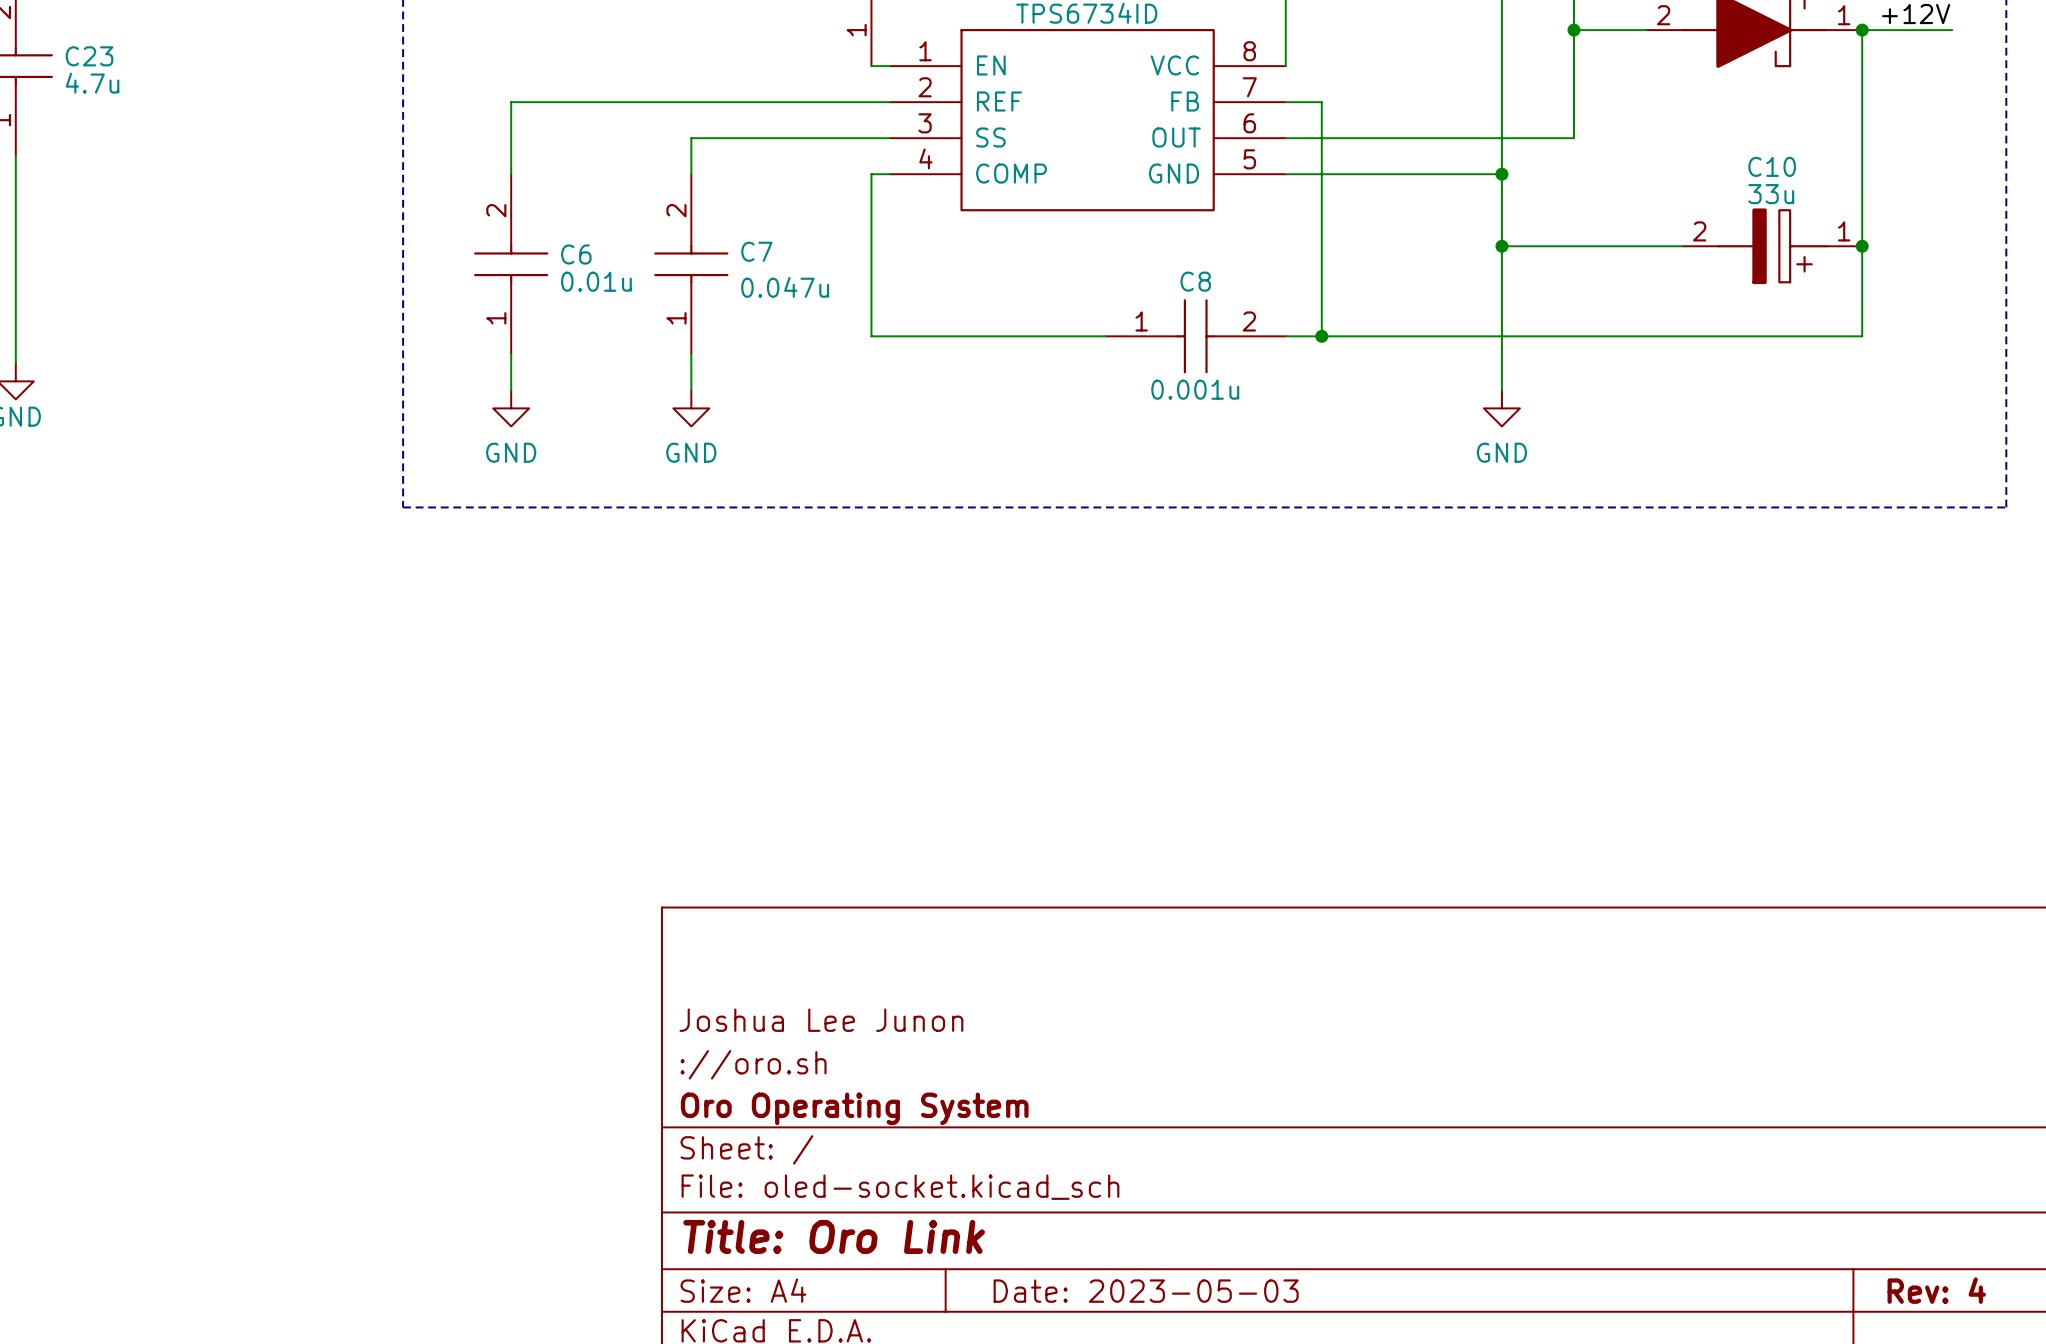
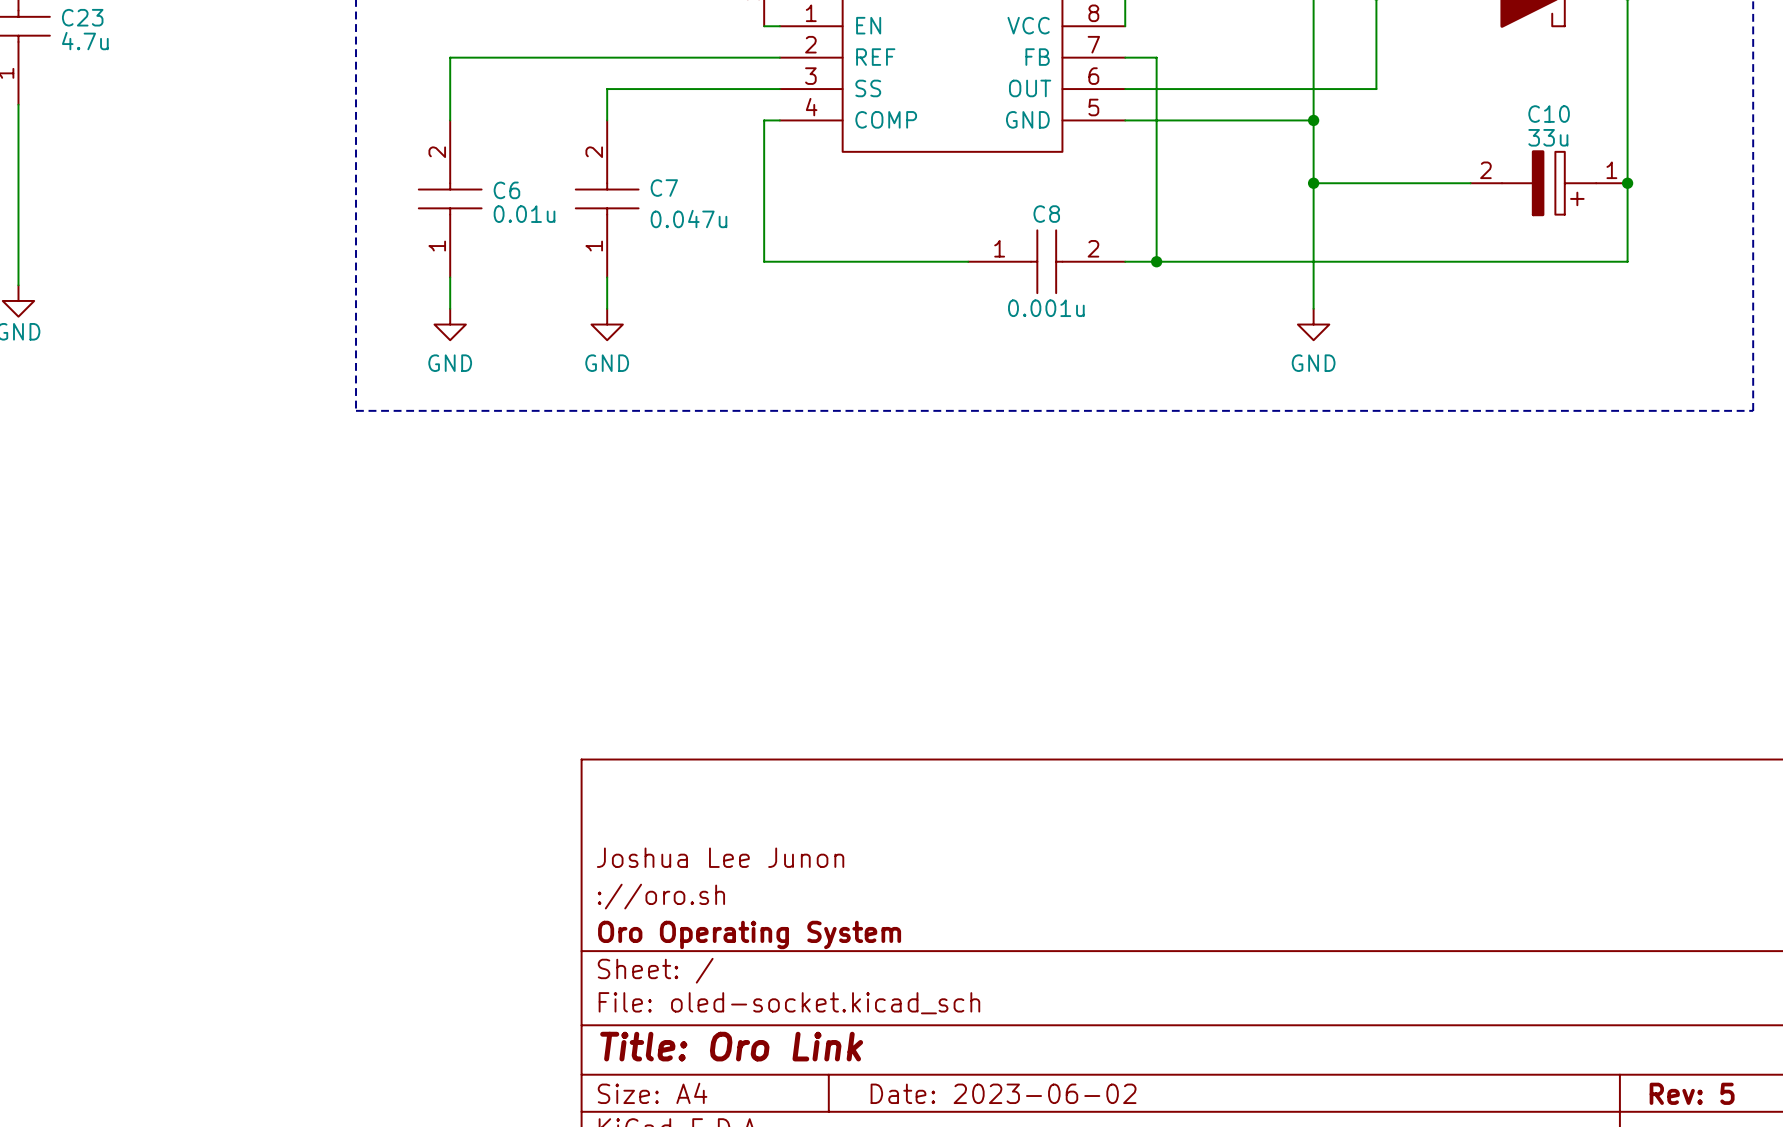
title block: Rev: 4 (1936, 1290) -> Rev: 5 (1692, 1093)
title block: Date: 2023-05-03 (1146, 1291) -> Date: 2023-06-02 (1003, 1093)

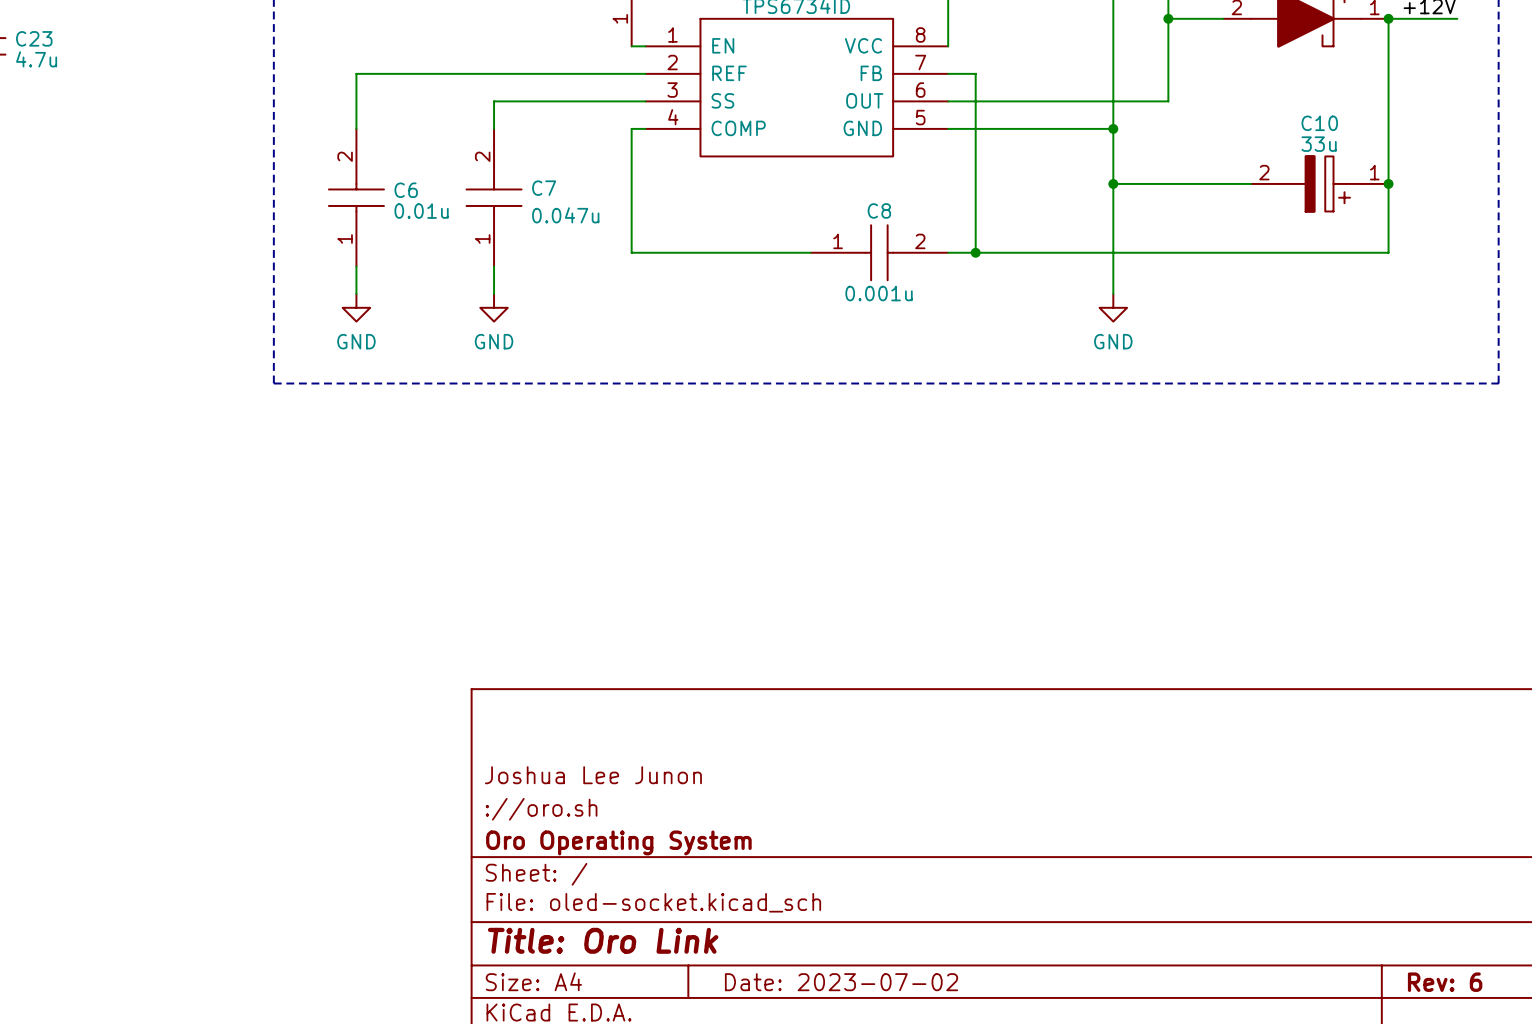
title block: Date: 2023-06-02 (1003, 1093) -> Date: 2023-07-02 (841, 982)
title block: Rev: 5 (1692, 1093) -> Rev: 6 (1445, 982)

